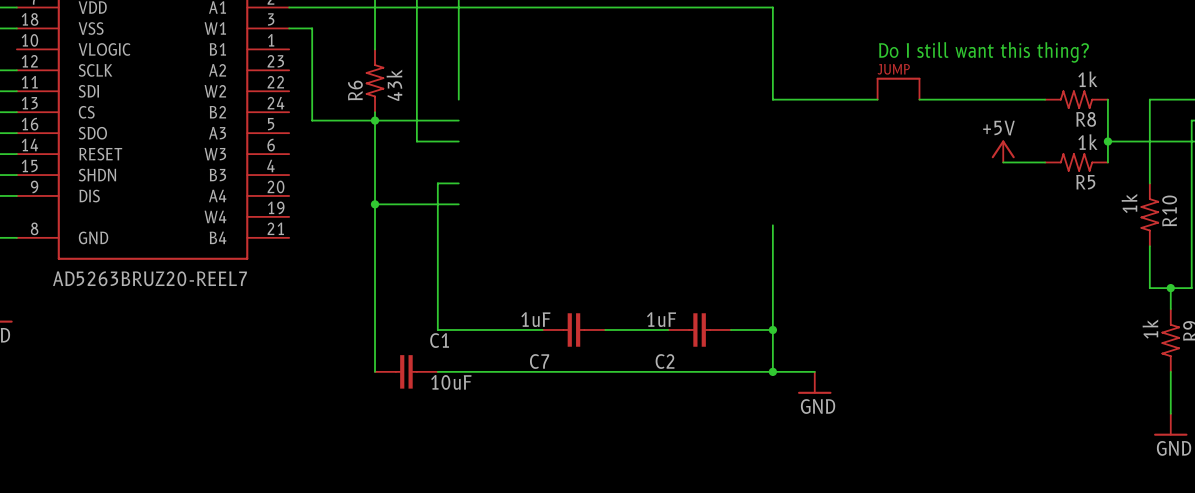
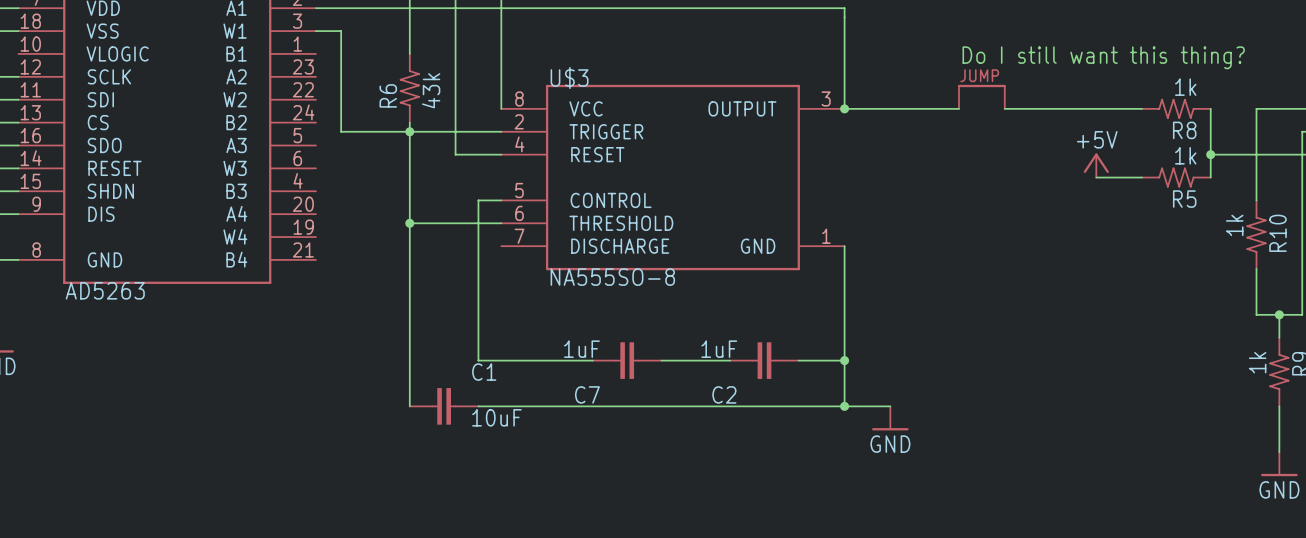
junction: none -> (844, 108)
U$3: none -> NA555SO-8 (672, 177)
part value: AD5263BRUZ20-REEL7 (149, 278) -> AD5263 (105, 290)

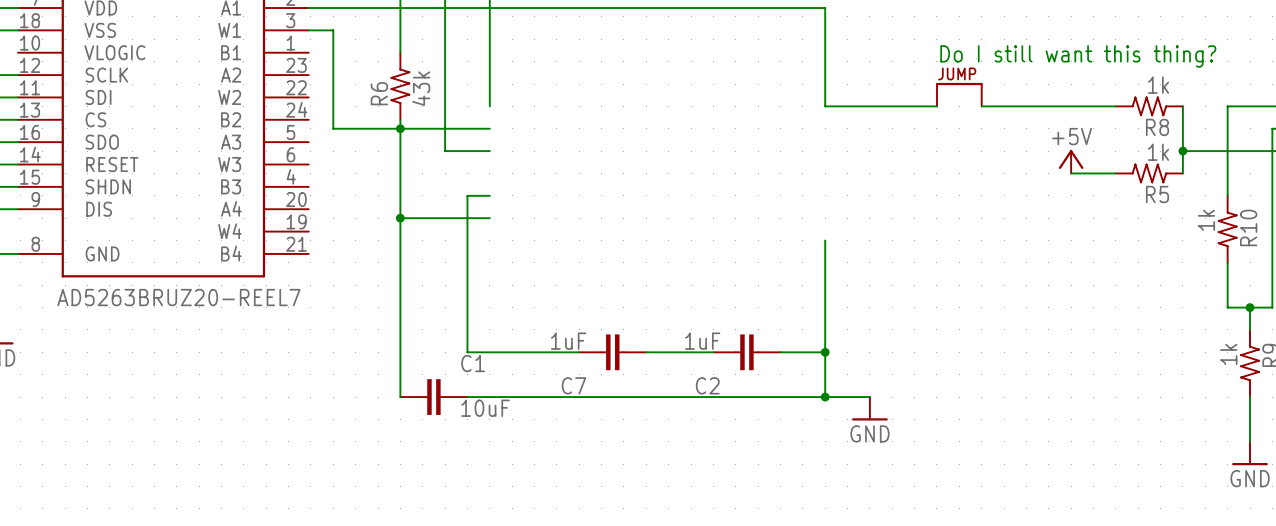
junction: (844, 108) -> none
U$3: NA555SO-8 (672, 177) -> none
part value: AD5263 (105, 290) -> AD5263BRUZ20-REEL7 (178, 297)

